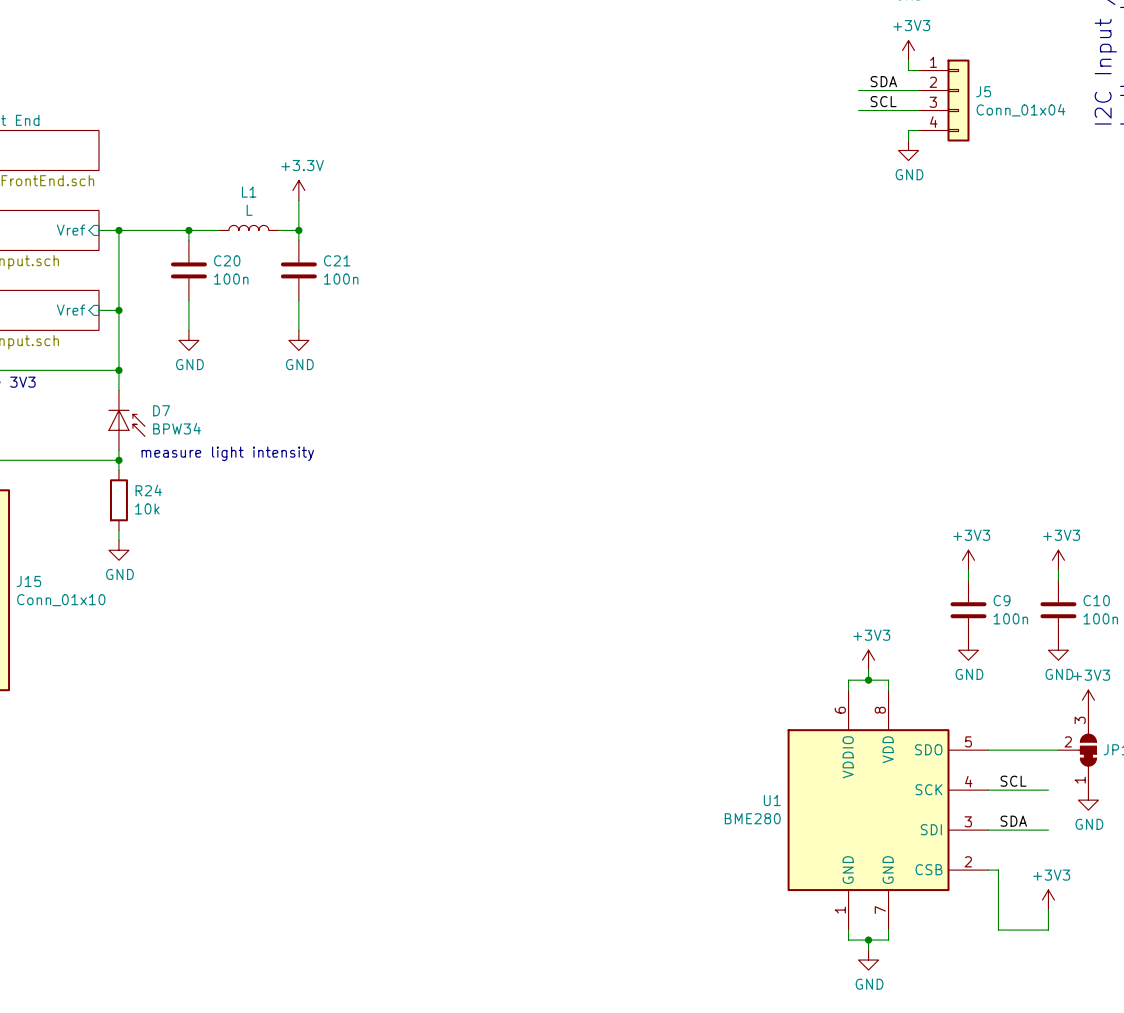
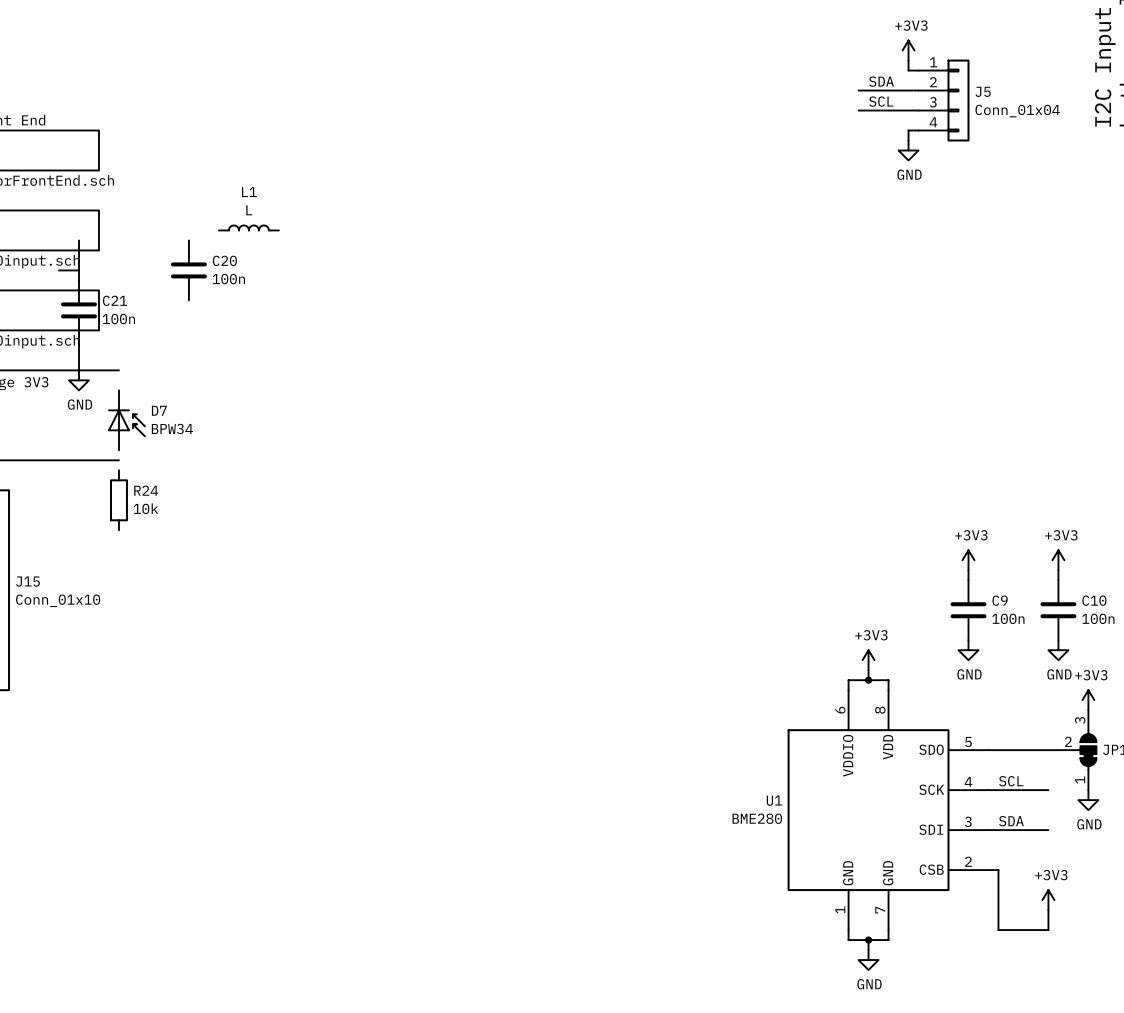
power symbol: +3.3V (298, 190) -> none
wire: (298, 200) (298, 240) -> none
sheet pin: Vref (70, 230) -> none
wire: (98, 230) (218, 230) -> none
wire: (118, 230) (118, 390) -> none
junction: (118, 230) -> none
wire: (188, 230) (188, 240) -> none
junction: (188, 230) -> none
wire: (278, 230) (298, 230) -> none
junction: (298, 230) -> none
wire: none -> (79, 240) (79, 280)
C21 position: (298, 270) -> (79, 310)
wire: (188, 300) (188, 330) -> (79, 340) (79, 370)
wire: (298, 300) (298, 330) -> none
sheet pin: Vref (70, 310) -> none
wire: (98, 310) (118, 310) -> (59, 270) (79, 270)
junction: (118, 310) -> none
power symbol: GND (188, 340) -> none
power symbol: GND (298, 340) -> none
junction: (118, 370) -> none
power symbol: none -> GND (79, 380)
wire: (118, 450) (118, 470) -> none
text: measure light intensity (227, 453) -> none
junction: (118, 460) -> none
wire: (118, 530) (118, 540) -> none
power symbol: GND (118, 550) -> none

